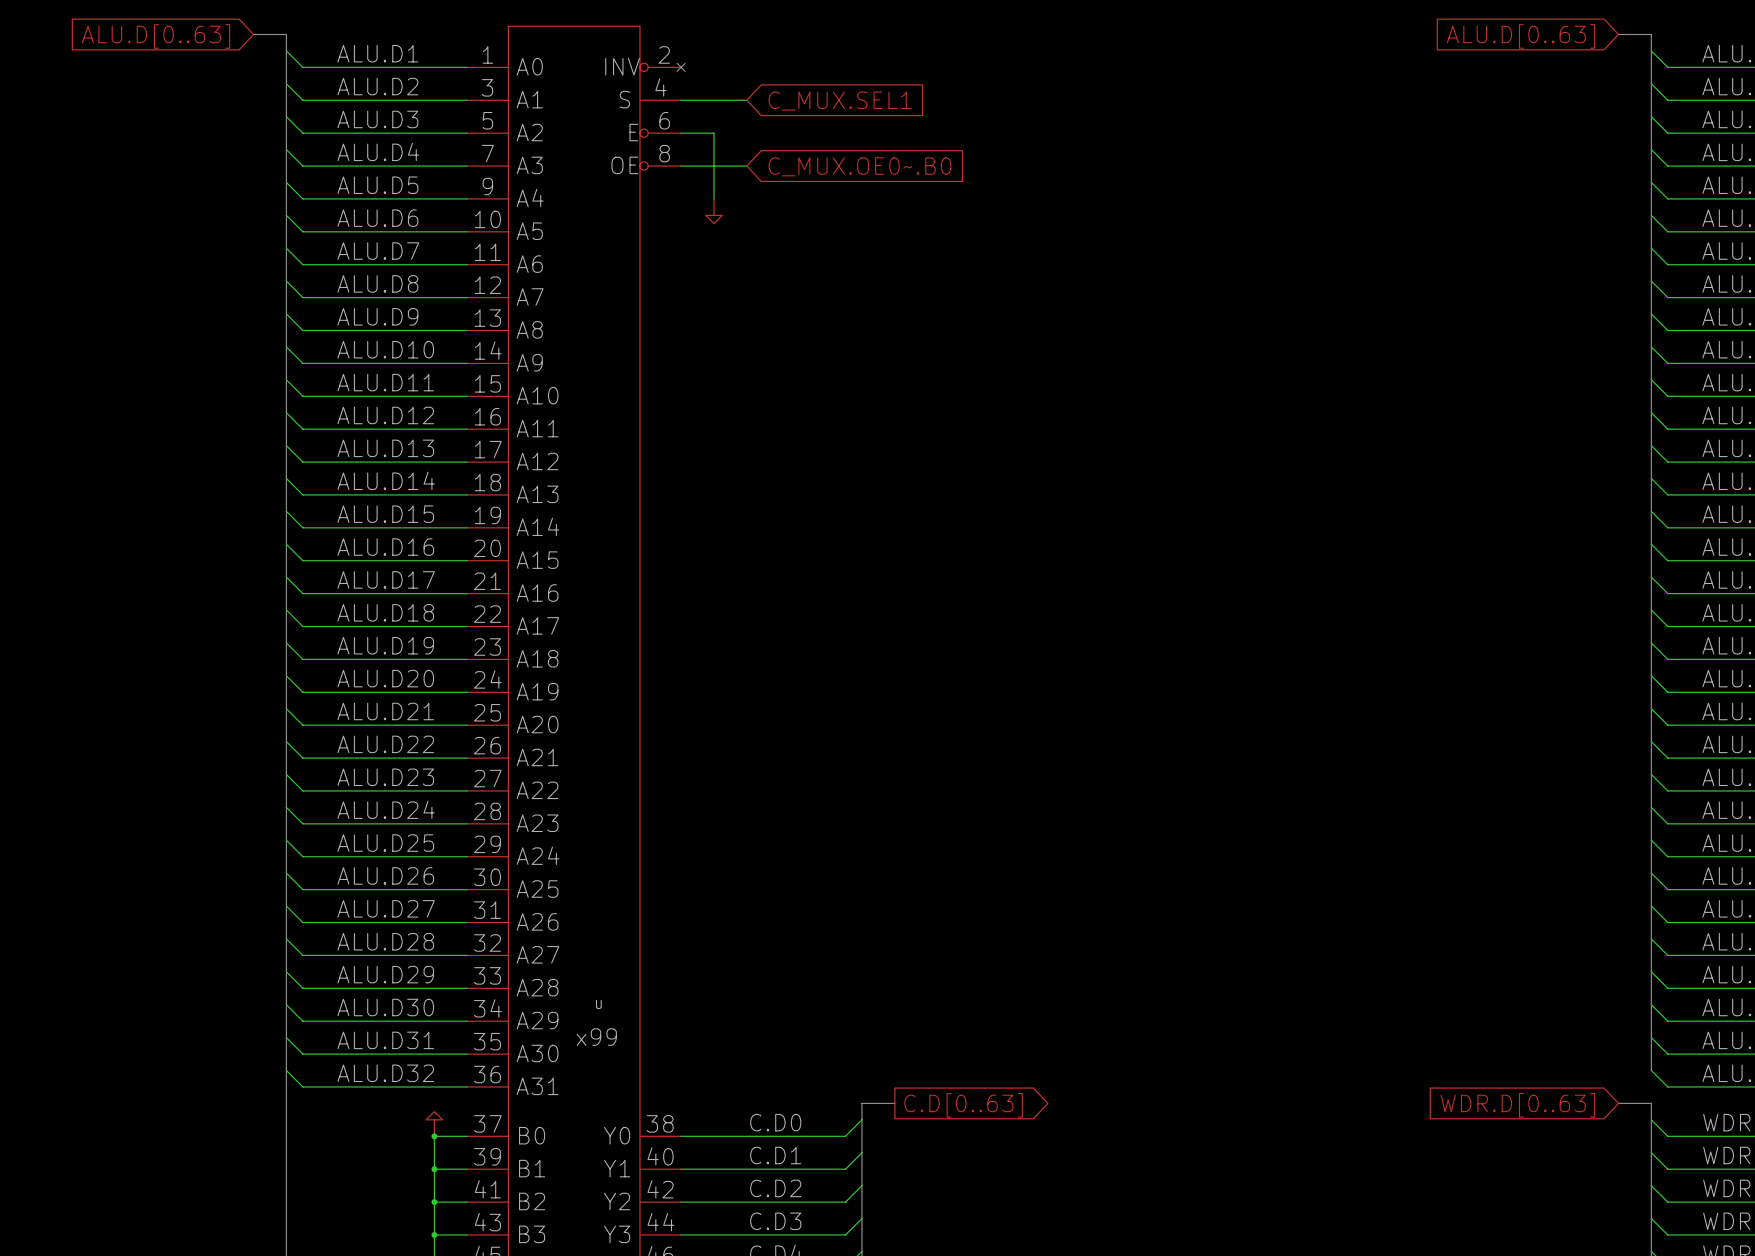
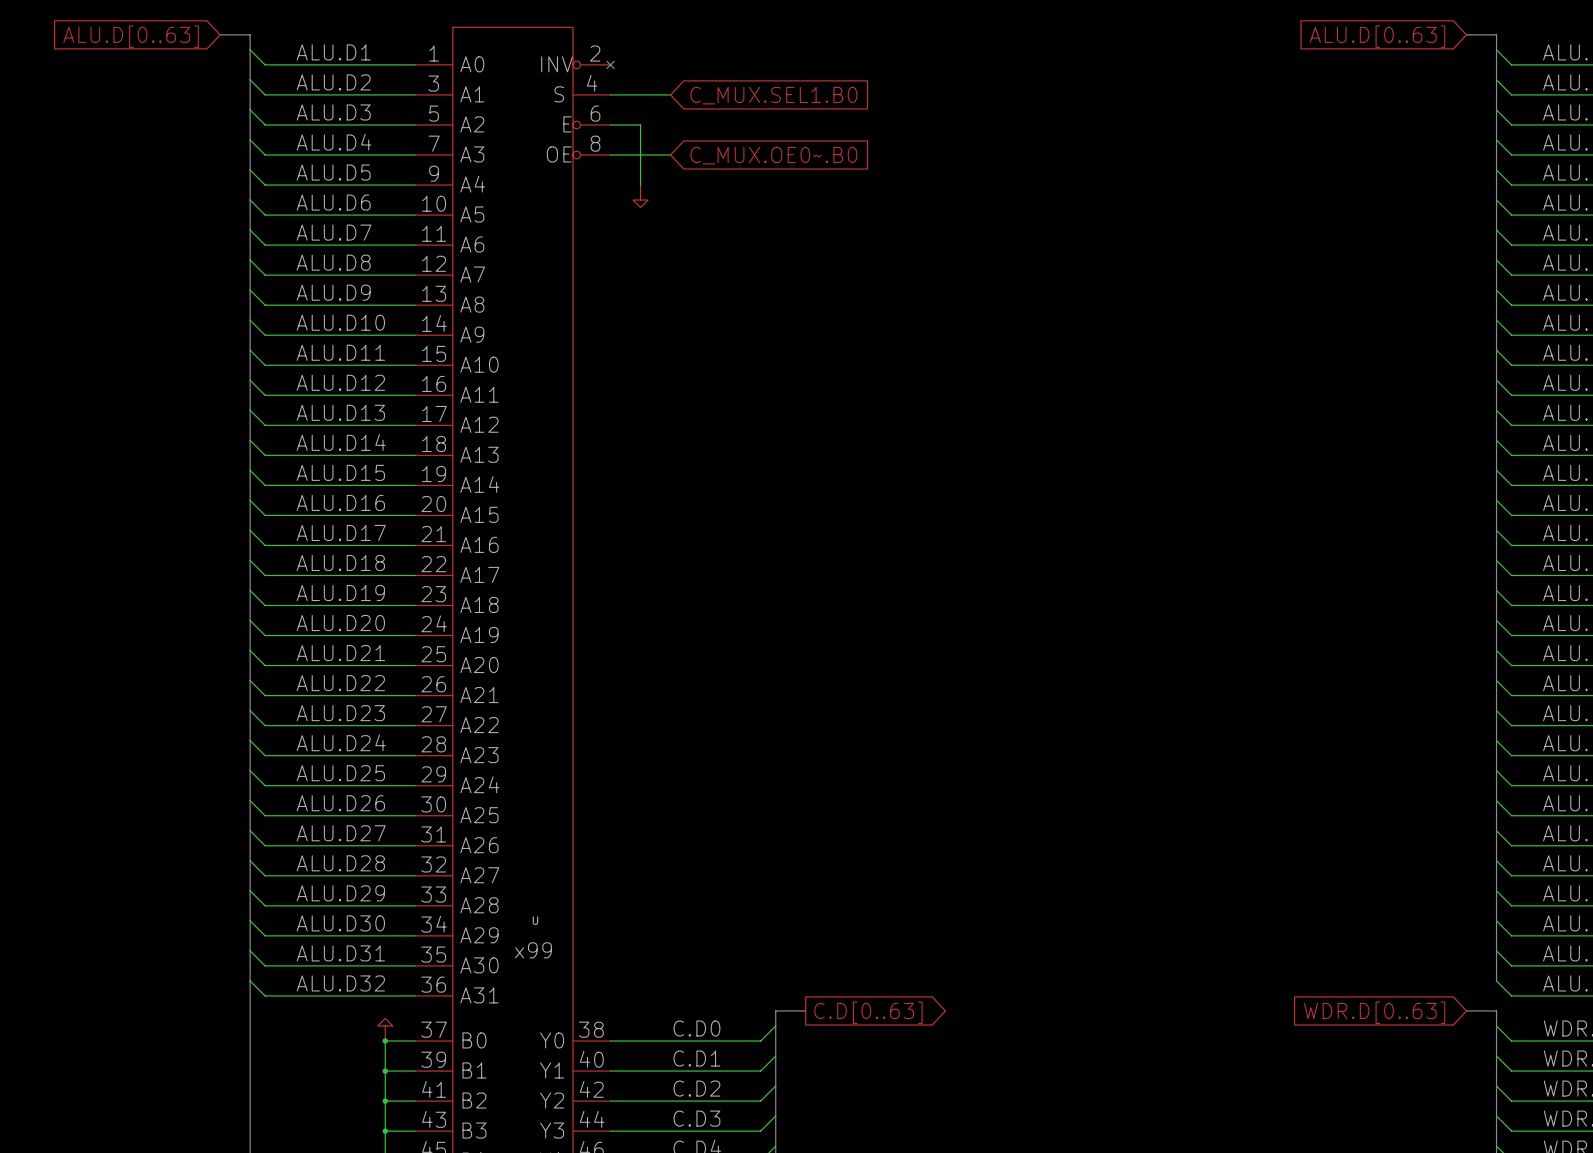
global label: C_MUX.SEL1 (840, 101) -> C_MUX.SEL1.B0 (773, 95)

